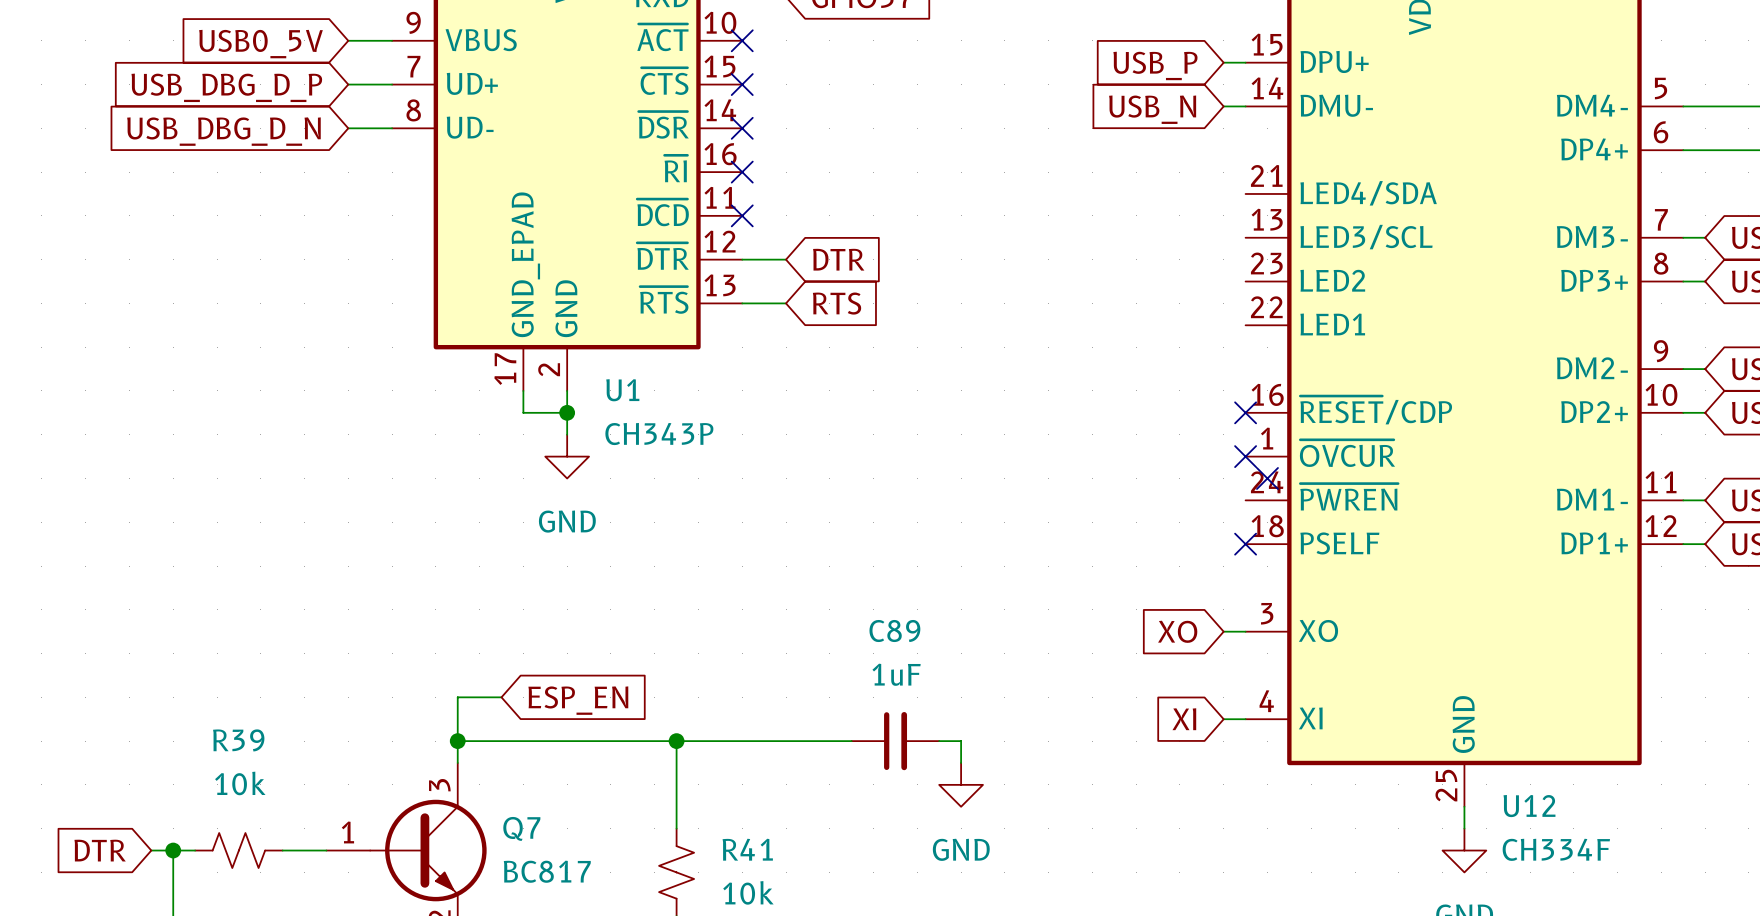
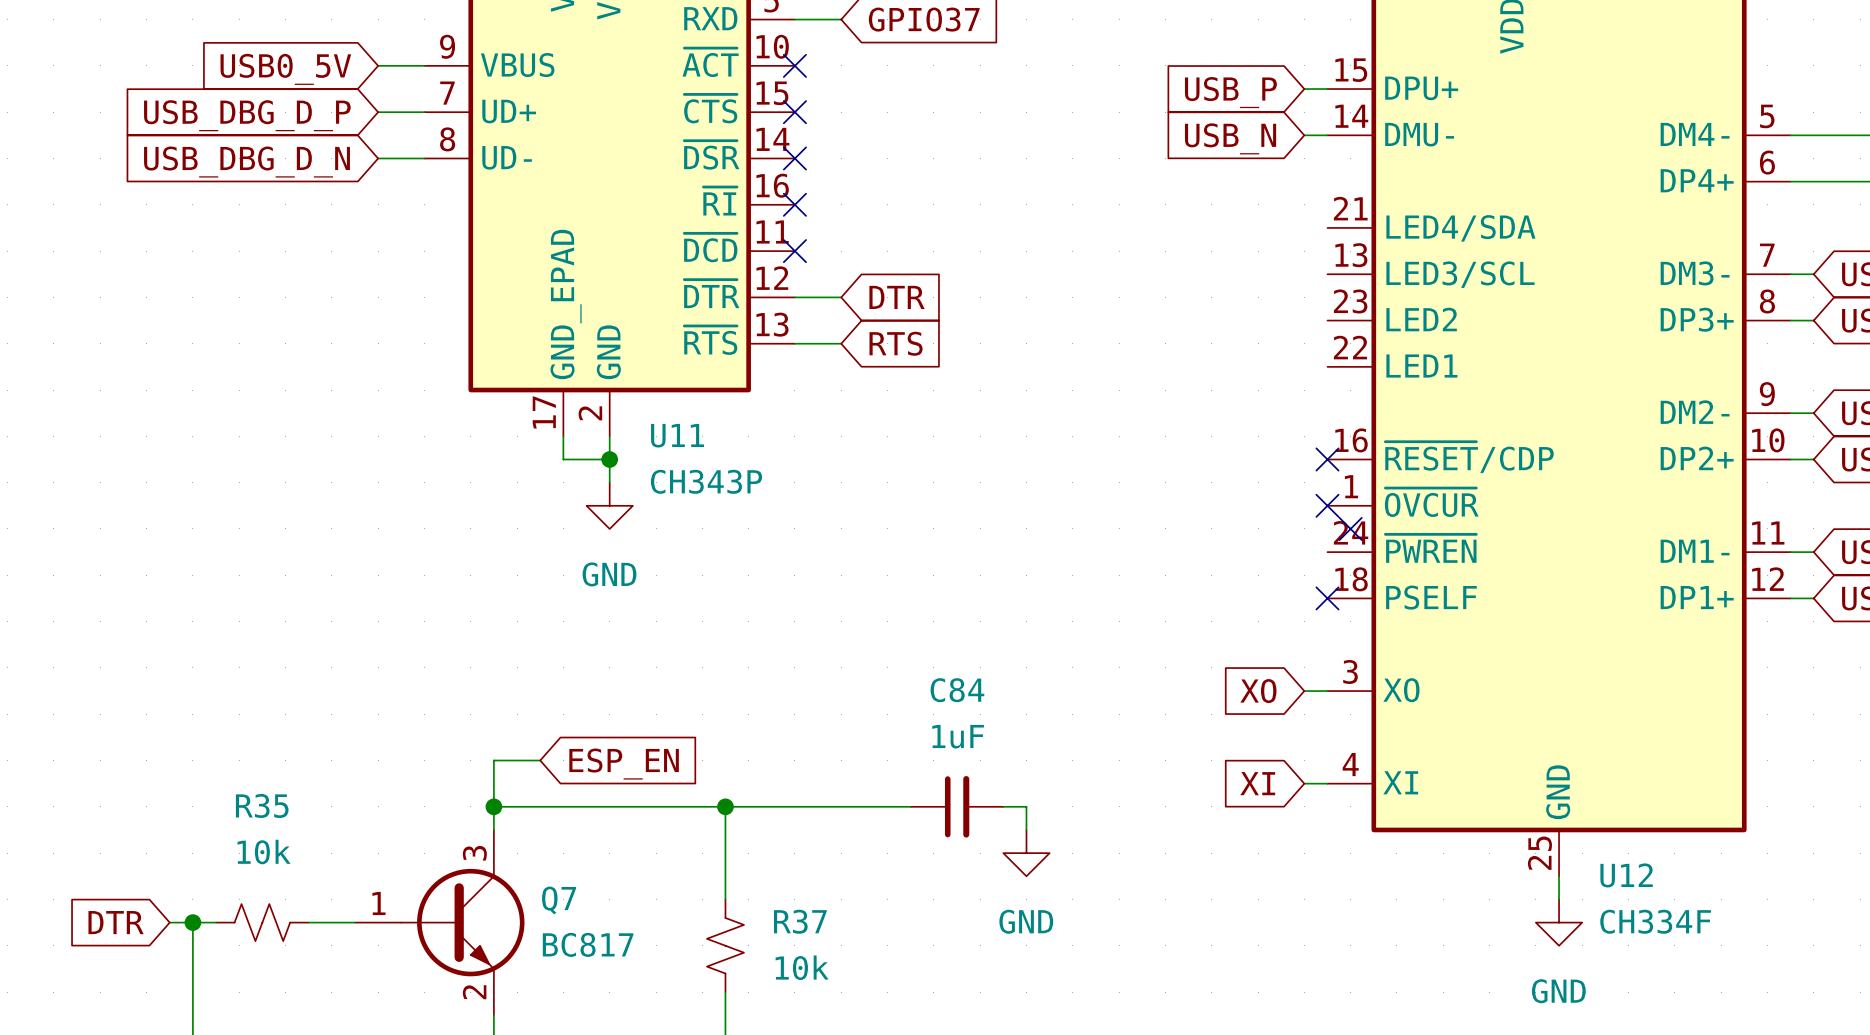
U1 name: U1 (622, 390) -> U11 (677, 435)
C89 name: C89 (894, 631) -> C84 (957, 690)
R39 name: R39 (238, 740) -> R35 (262, 805)
R41 name: R41 (747, 849) -> R37 (800, 921)

